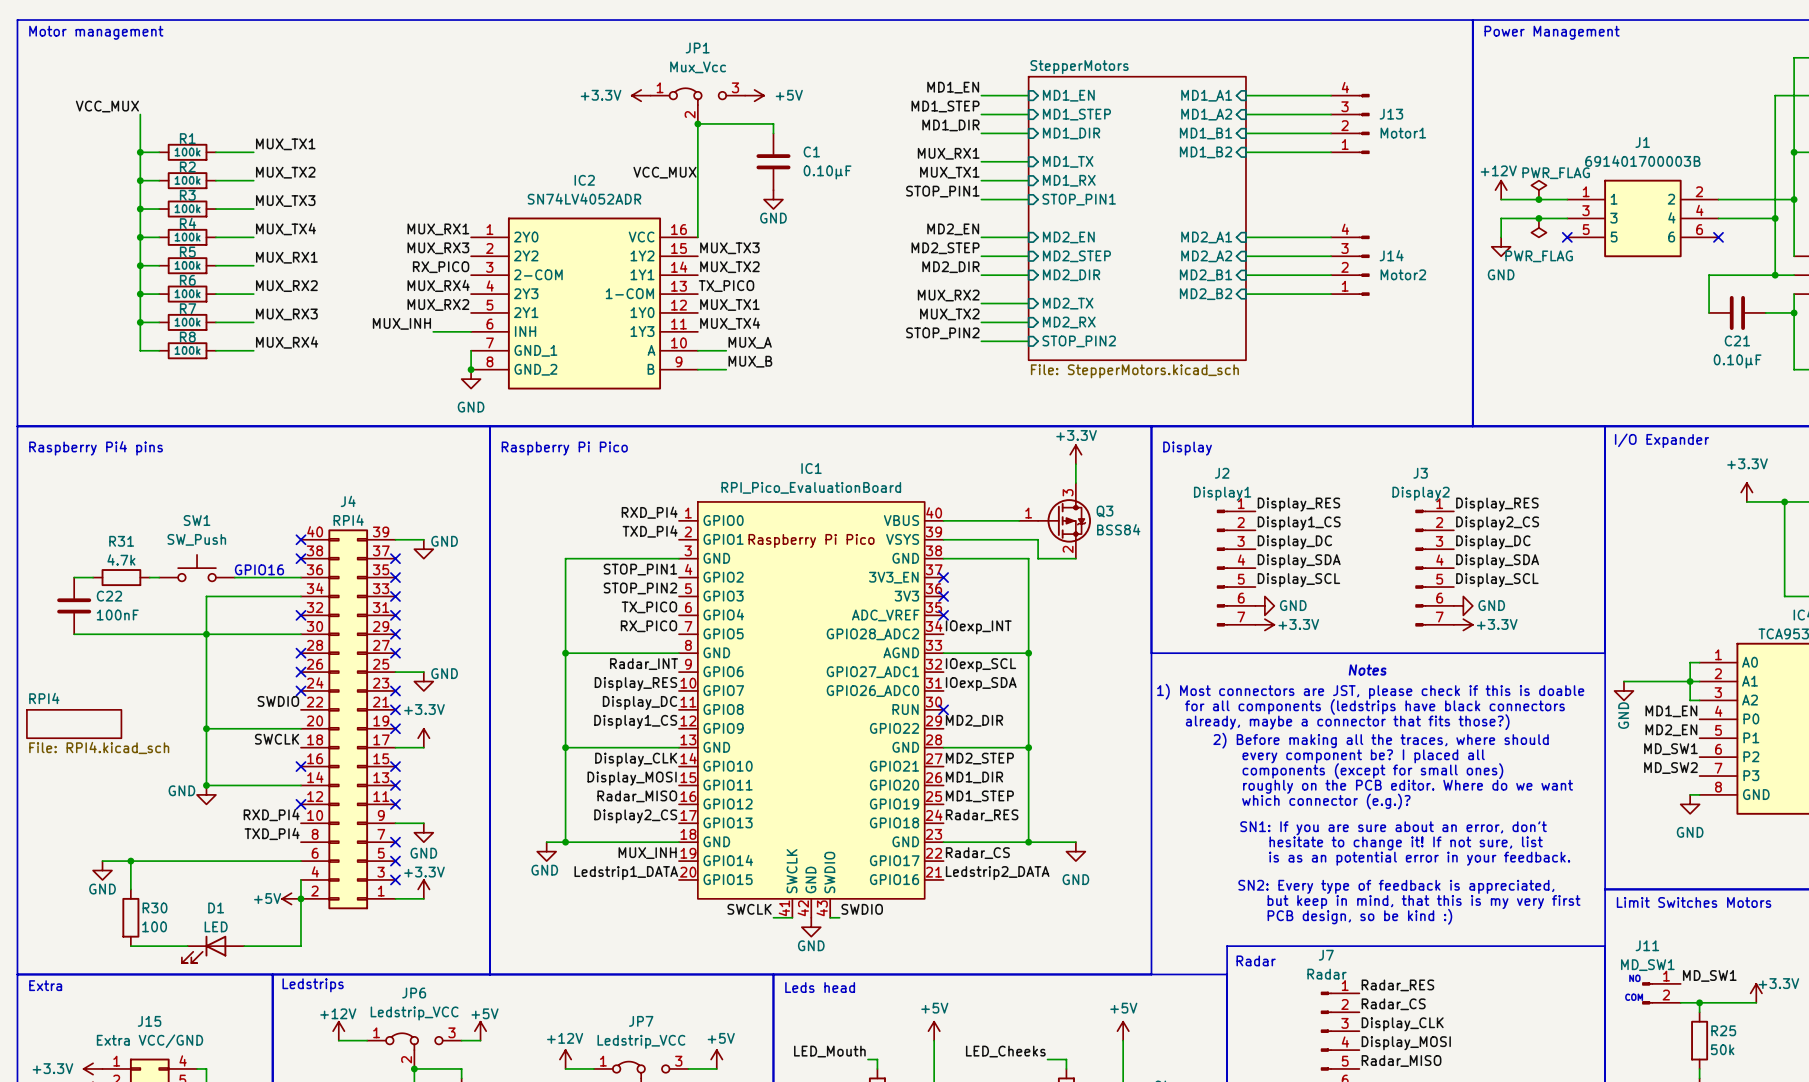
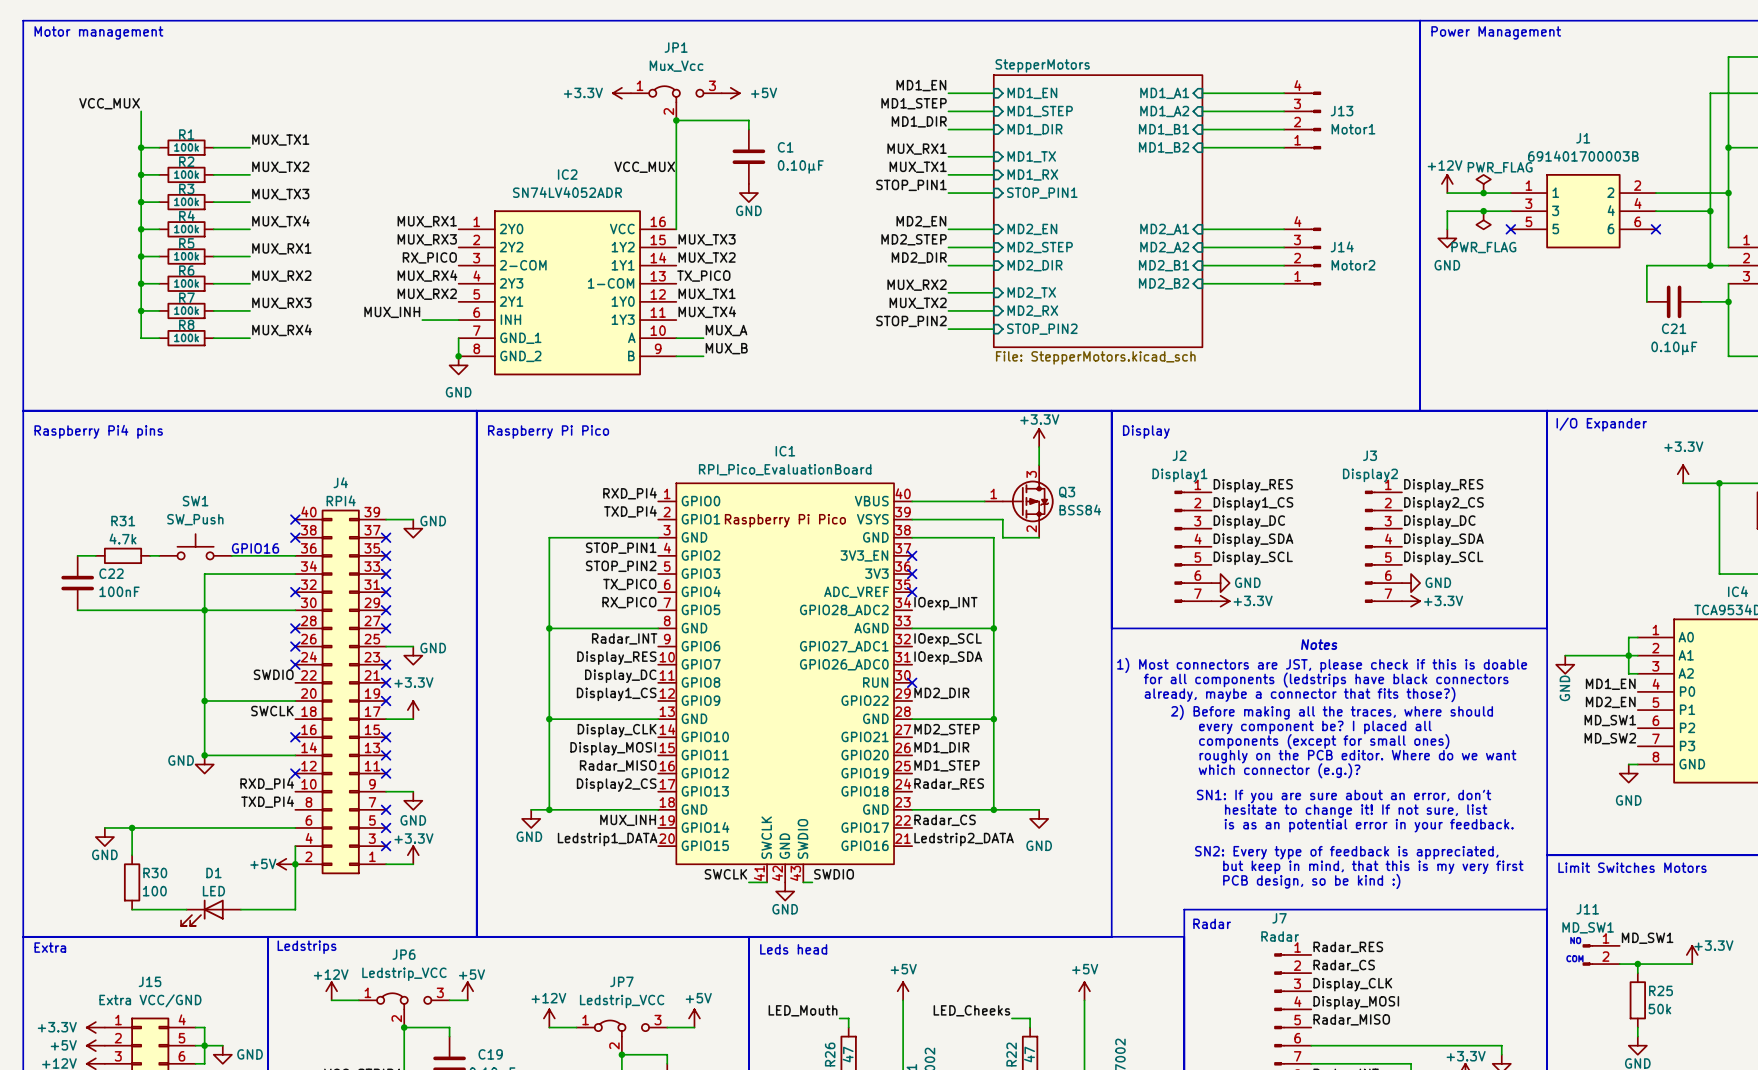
sheet RPI4: File: RPI4.kicad_sch (74, 724) -> none

